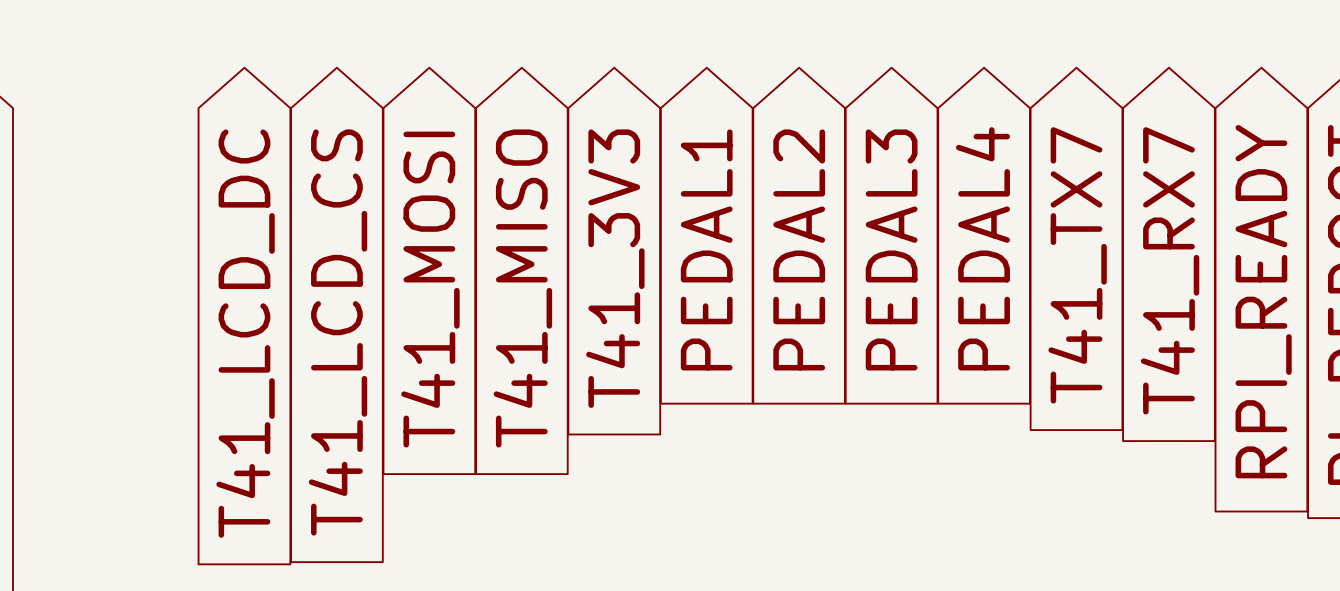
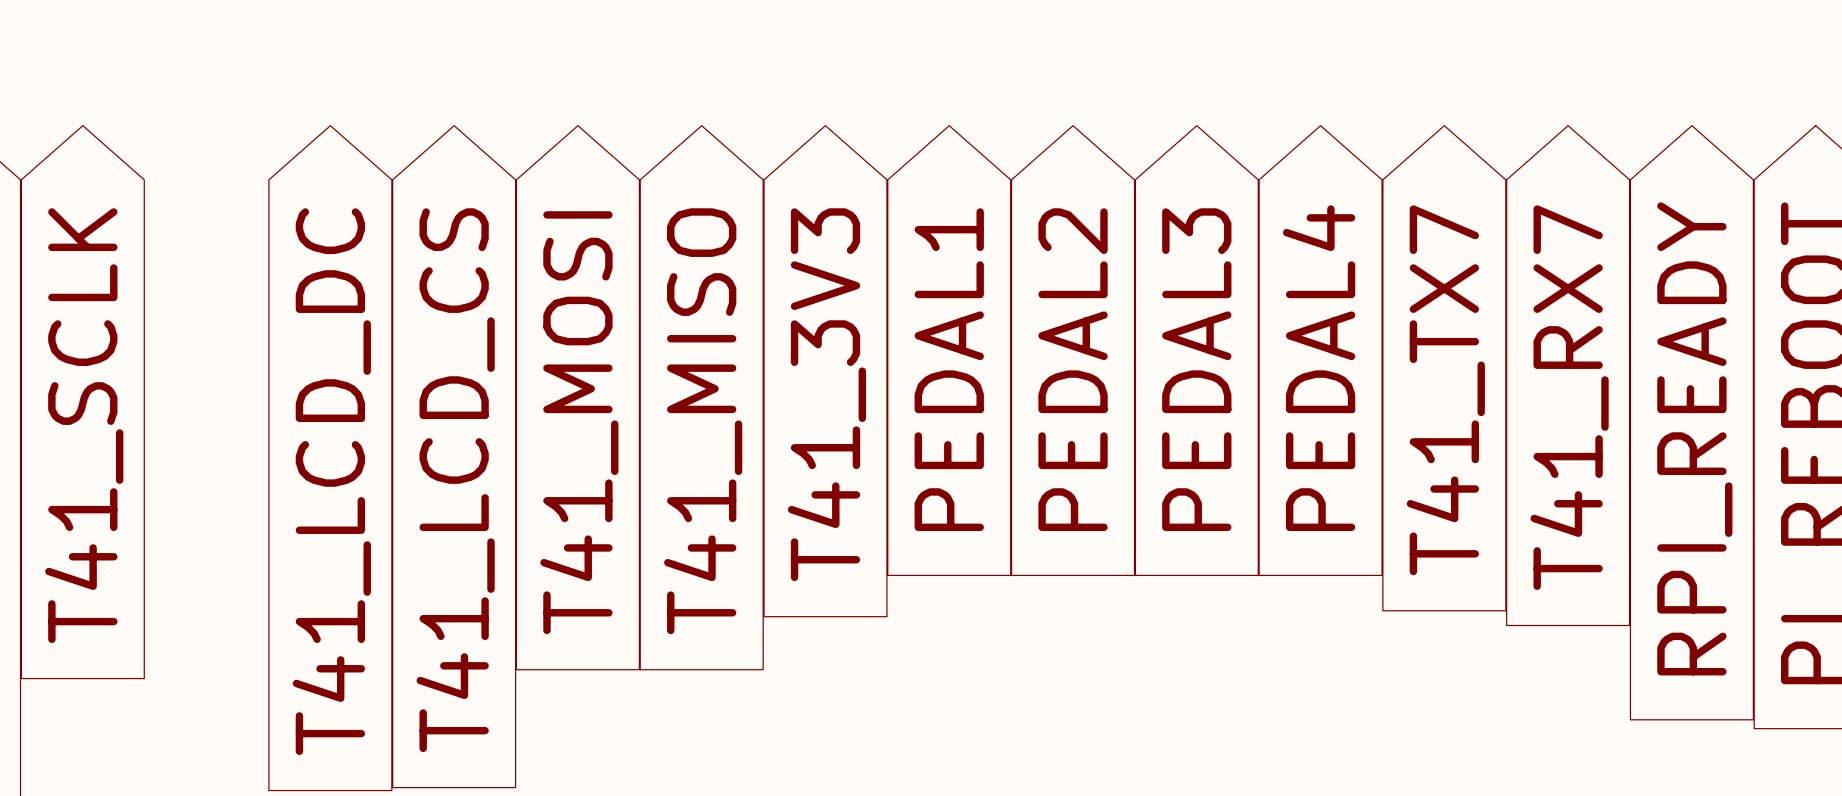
global label: none -> T41_SCLK (84, 425)

